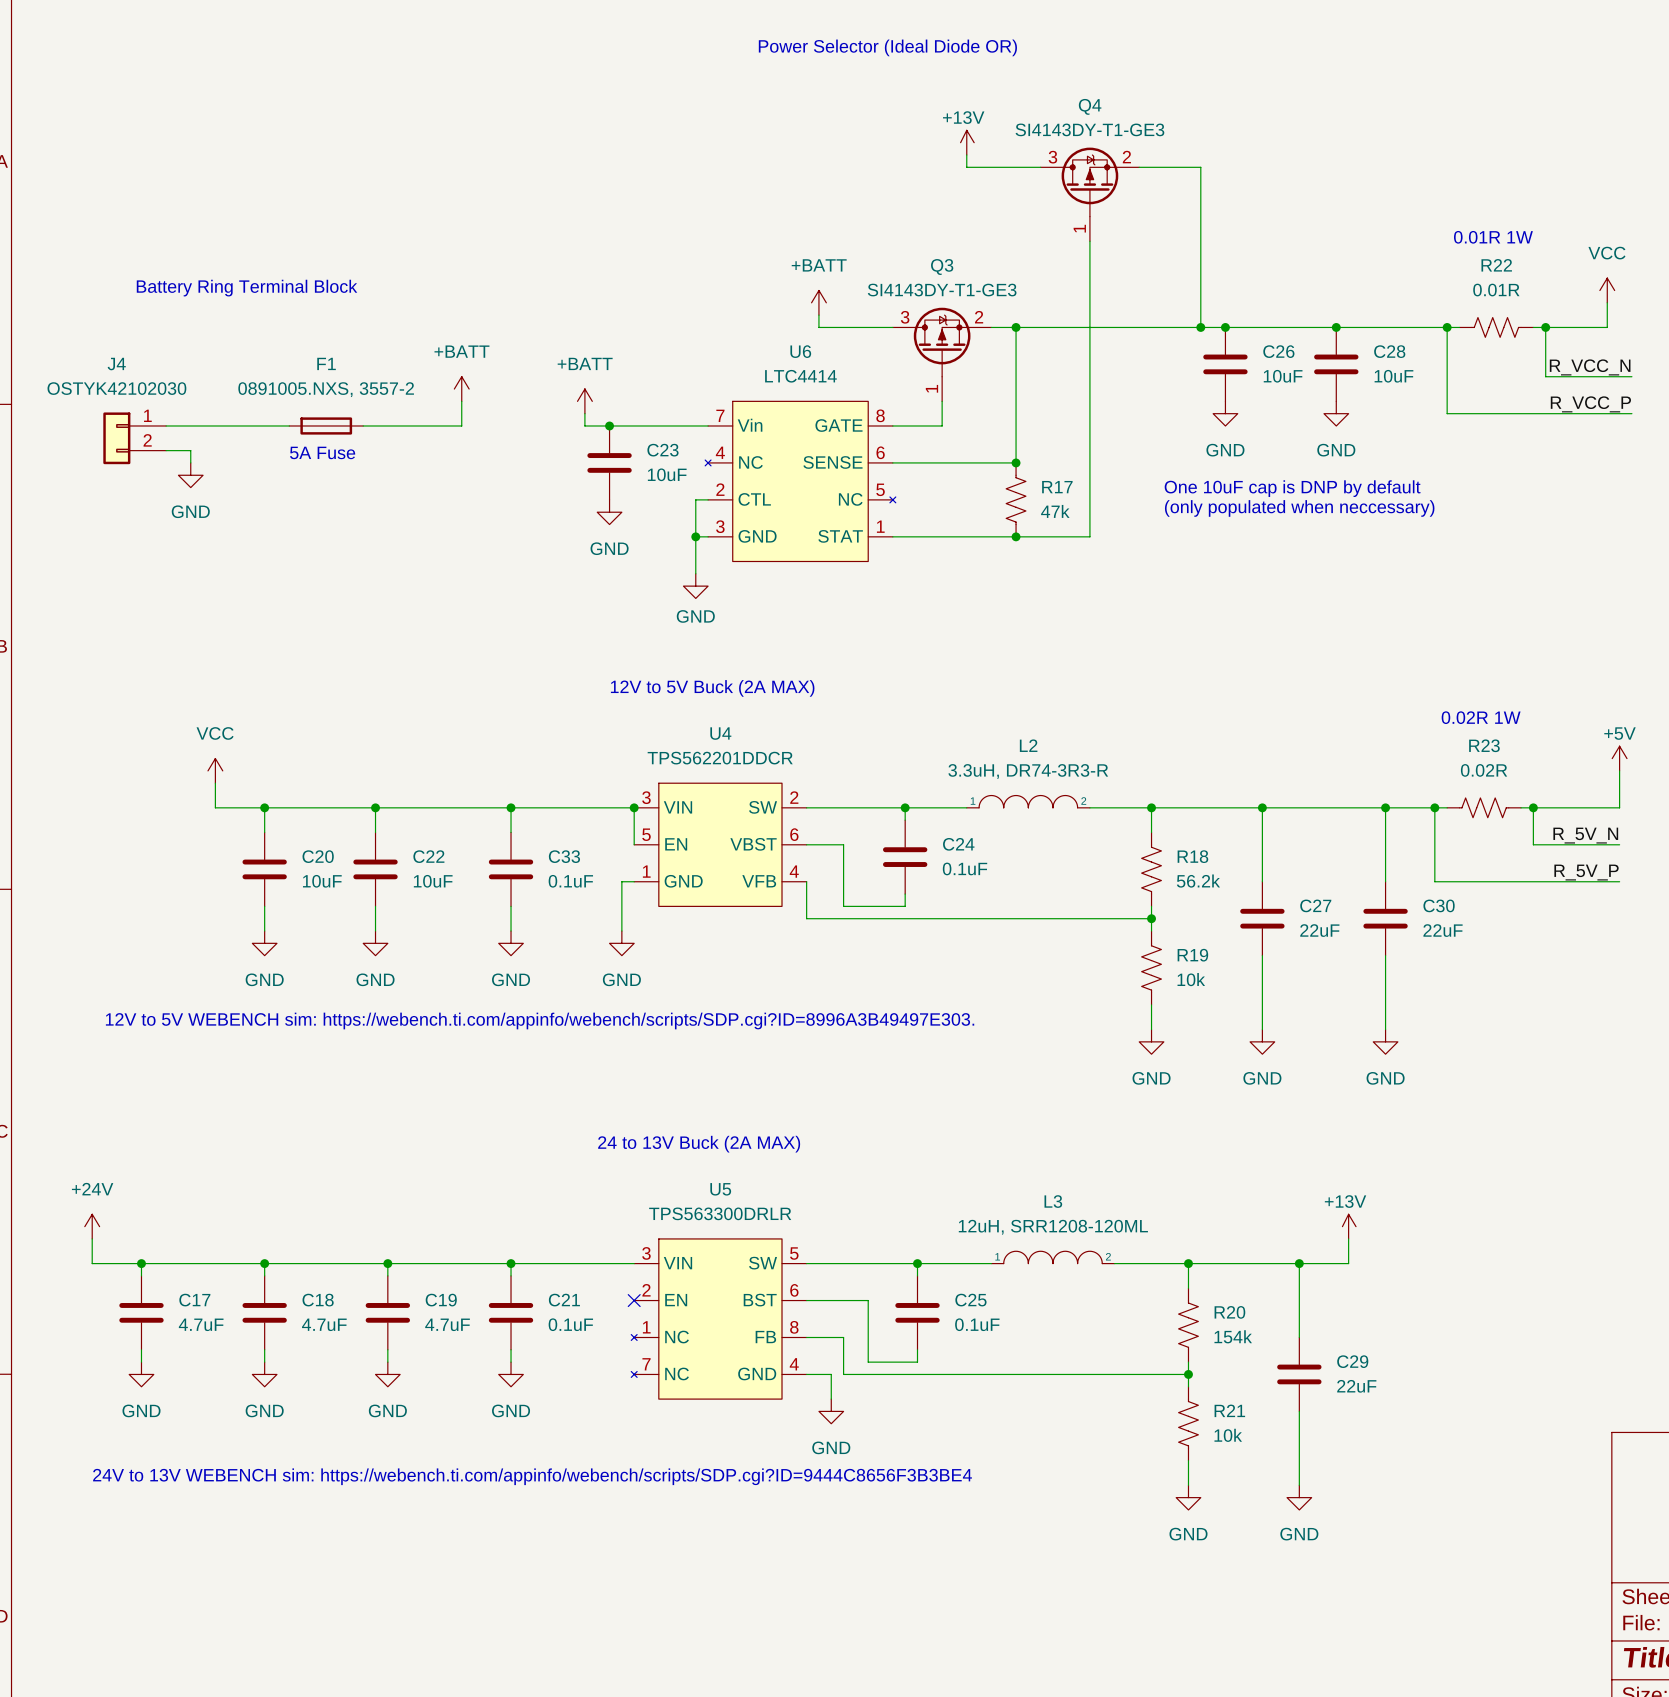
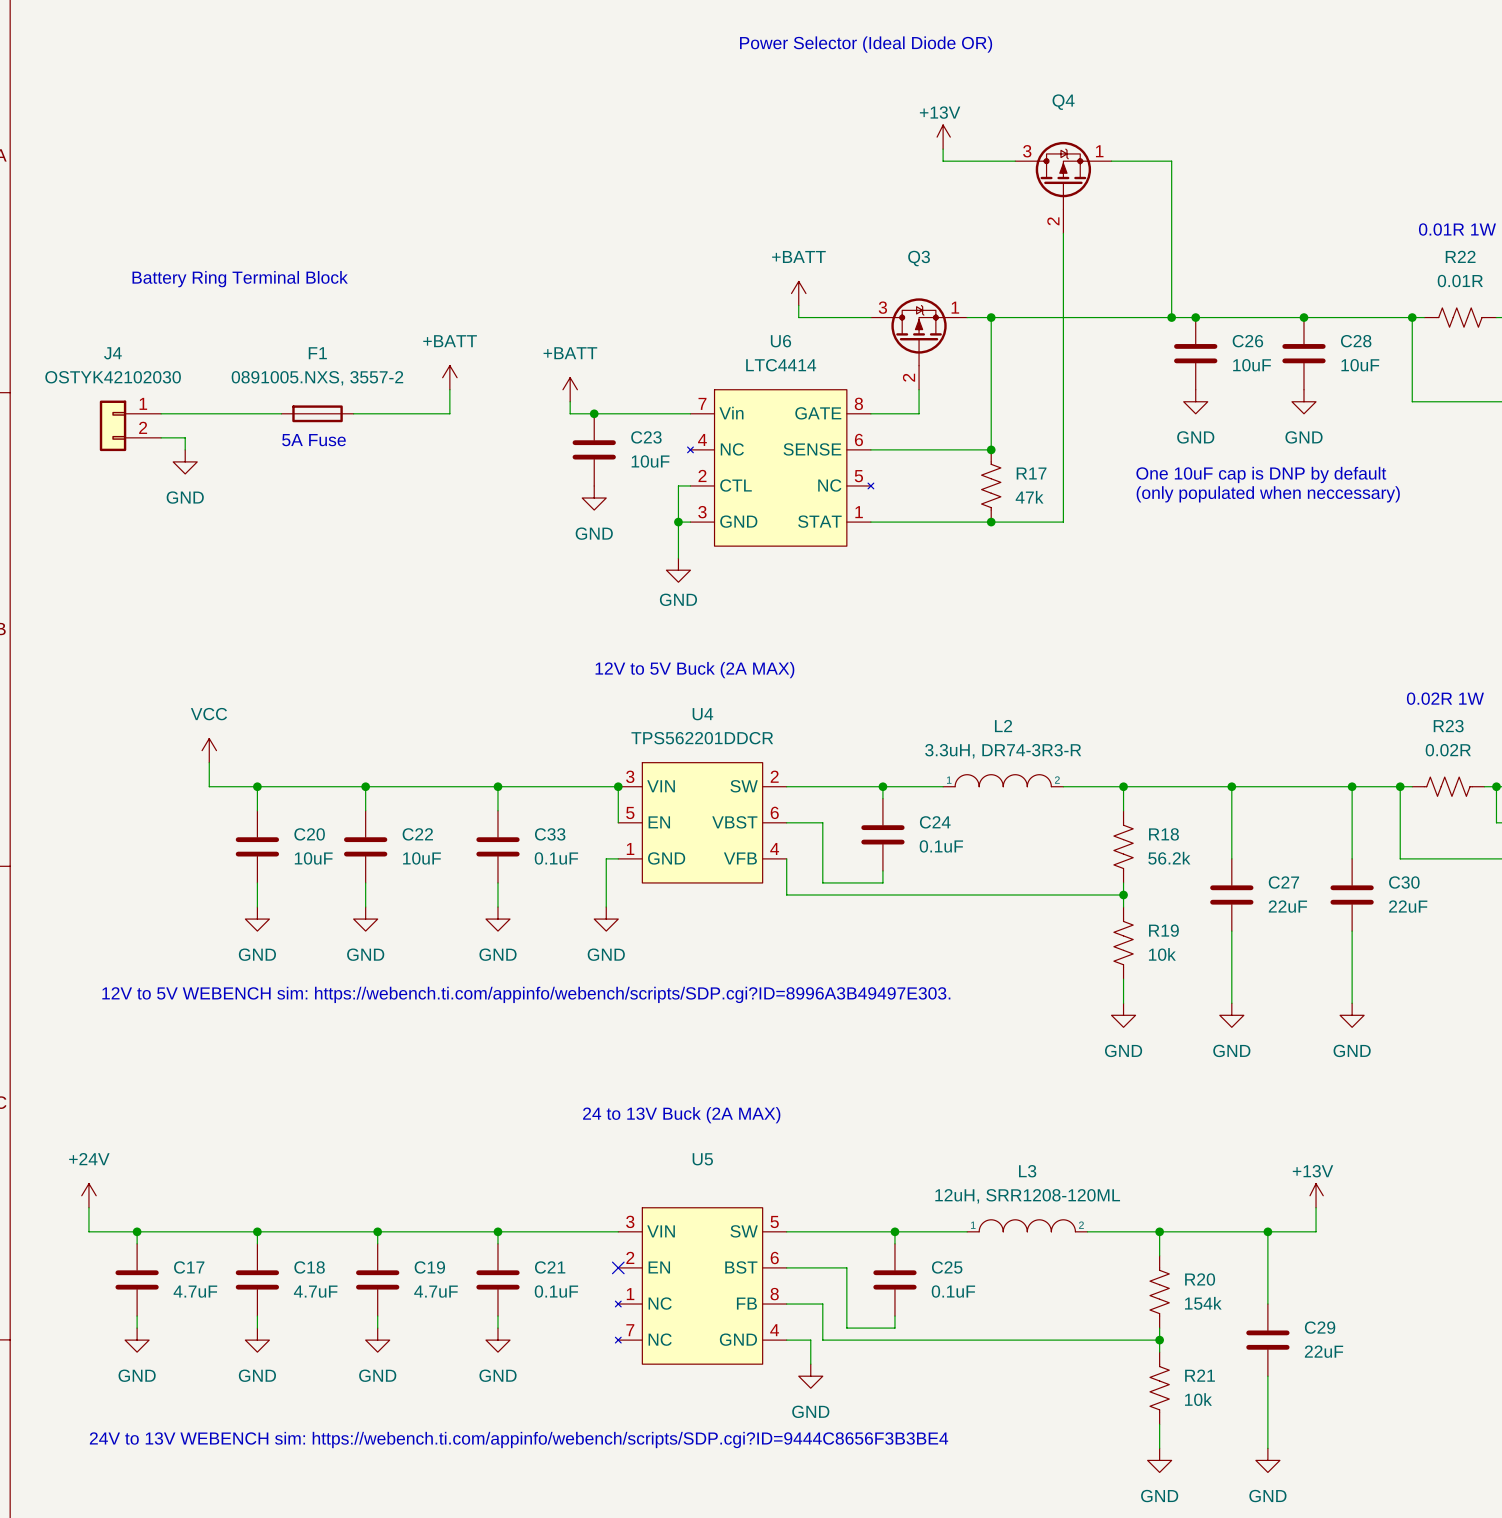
Q4 value: SI4143DY-T1-GE3 (1089, 129) -> none
Q4 pin number: 2 (1126, 157) -> 1 (1099, 151)
Q4 pin number: 1 (1079, 228) -> 2 (1053, 221)
Q3 value: SI4143DY-T1-GE3 (942, 290) -> none
Q3 pin number: 2 (979, 317) -> 1 (955, 307)
Q3 pin number: 1 (931, 388) -> 2 (909, 377)
U5 value: TPS563300DRLR (720, 1213) -> none

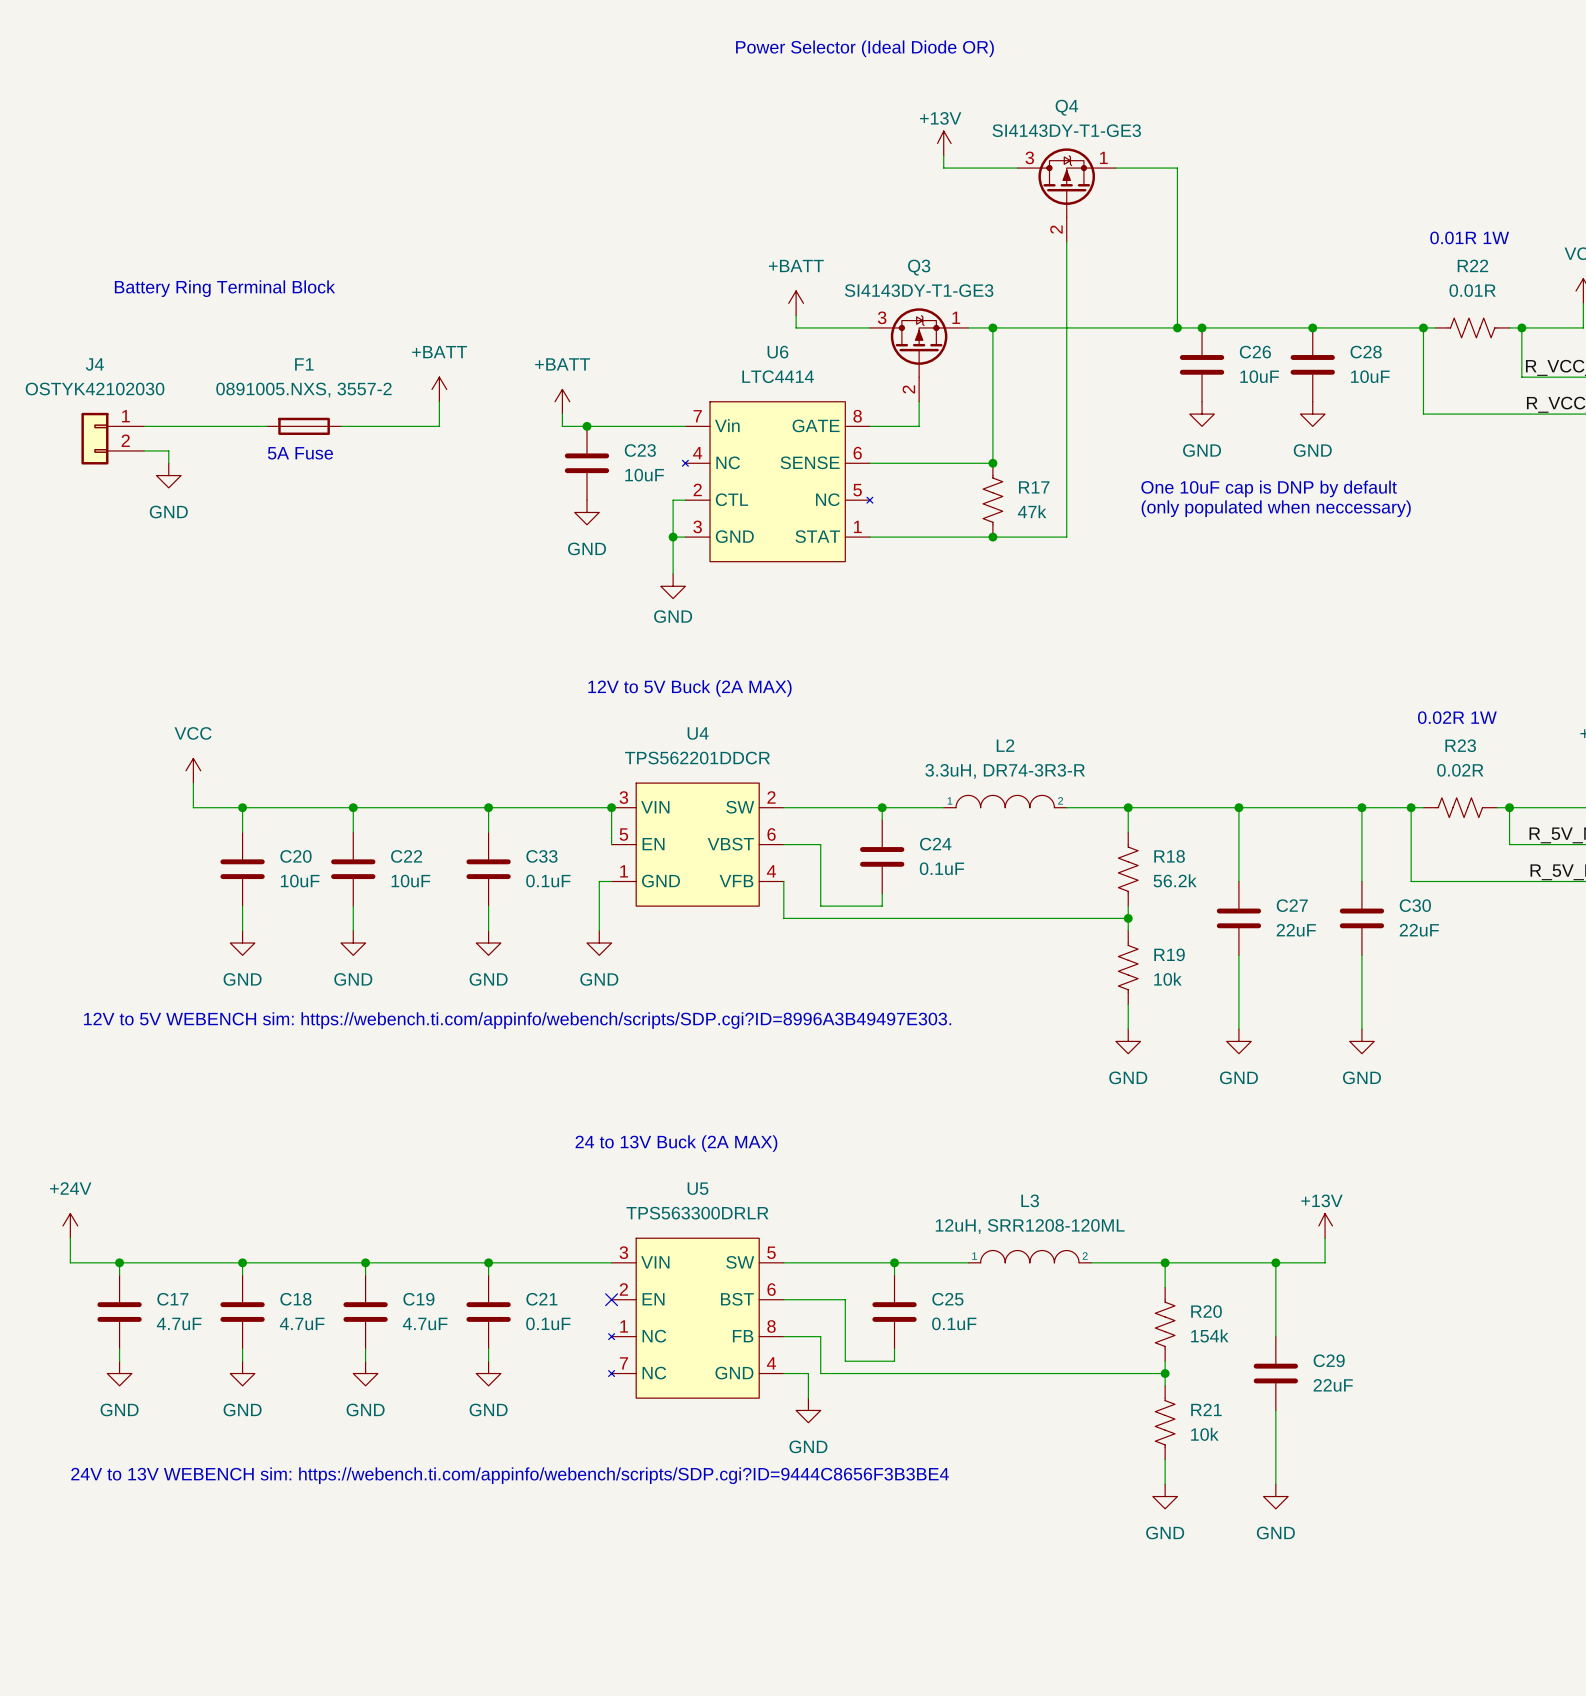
Q4 value: none -> SI4143DY-T1-GE3 (1066, 130)
Q3 value: none -> SI4143DY-T1-GE3 (919, 290)
U5 value: none -> TPS563300DRLR (697, 1213)

